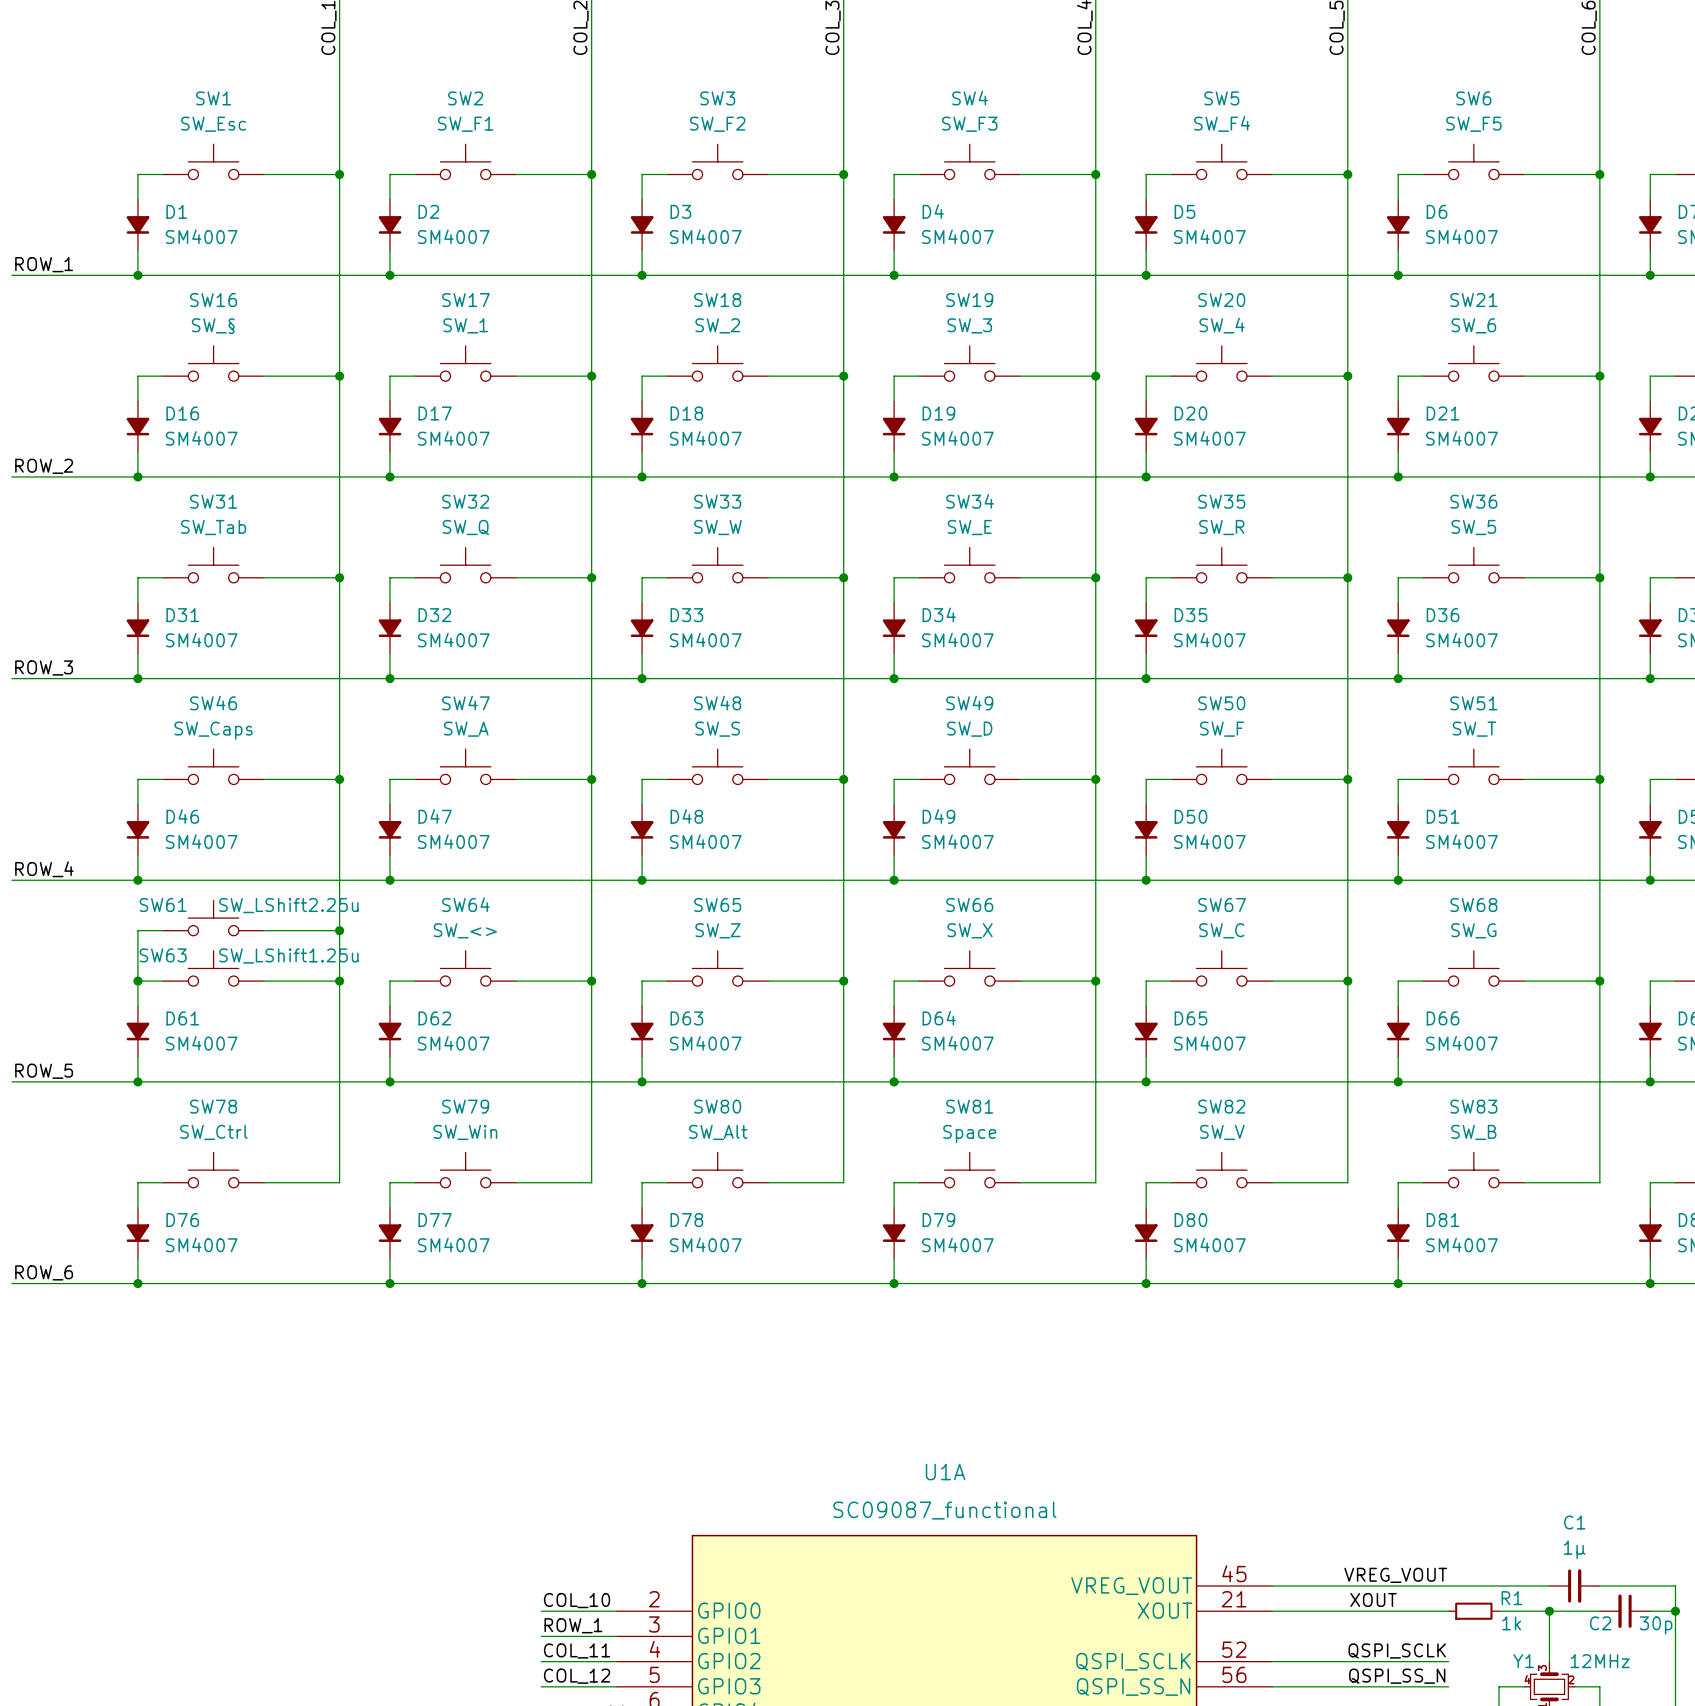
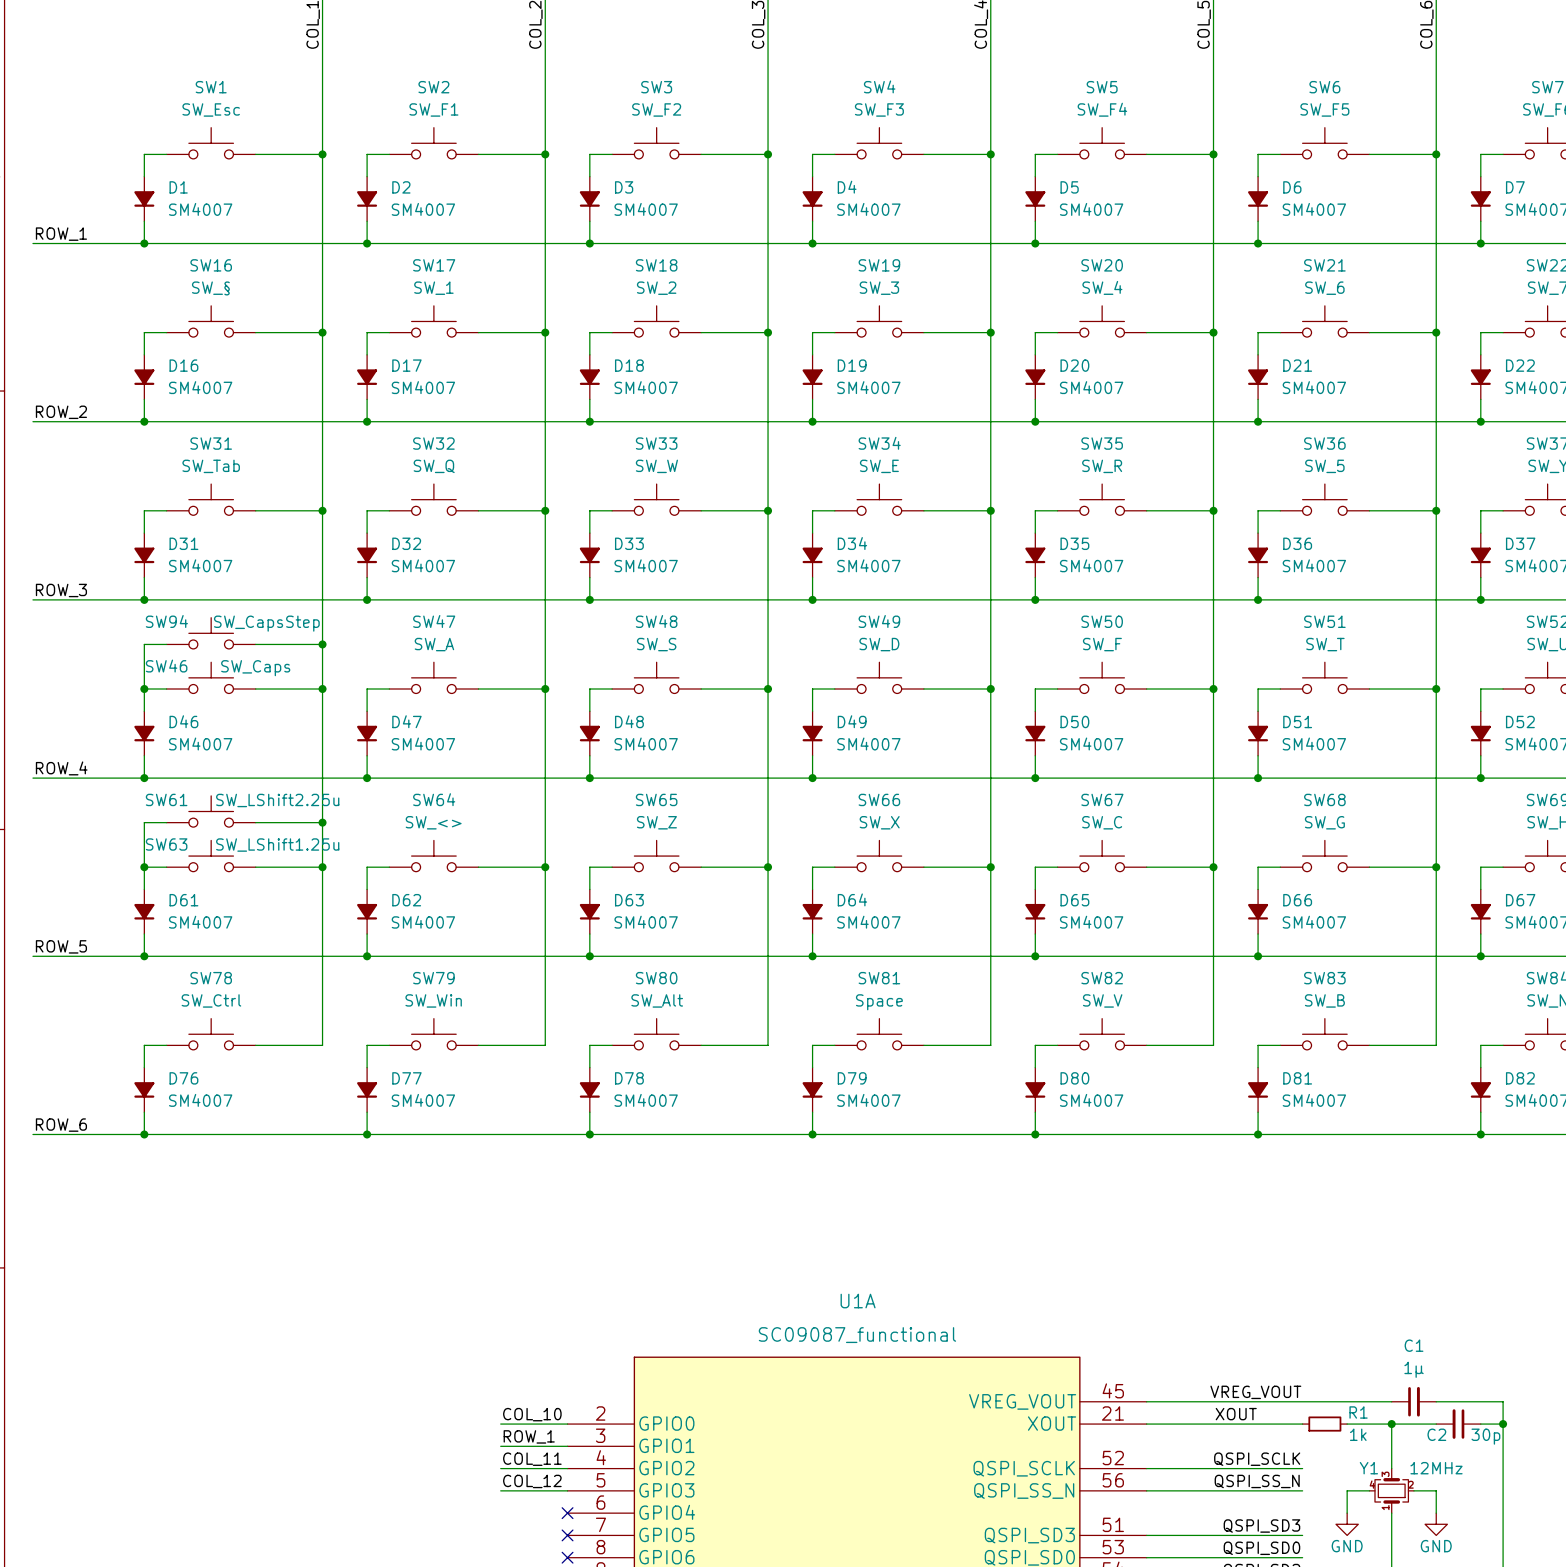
SW46 name position: SW46 (213, 703) -> SW46 (166, 666)
SW94: none -> SW_CapsStep (211, 633)
wire: none -> (166, 644) (144, 644) (144, 689)
wire: none -> (255, 644) (322, 644)
junction: none -> (322, 644)
SW46 value position: SW_Caps (213, 730) -> SW_Caps (255, 668)
junction: none -> (144, 689)

